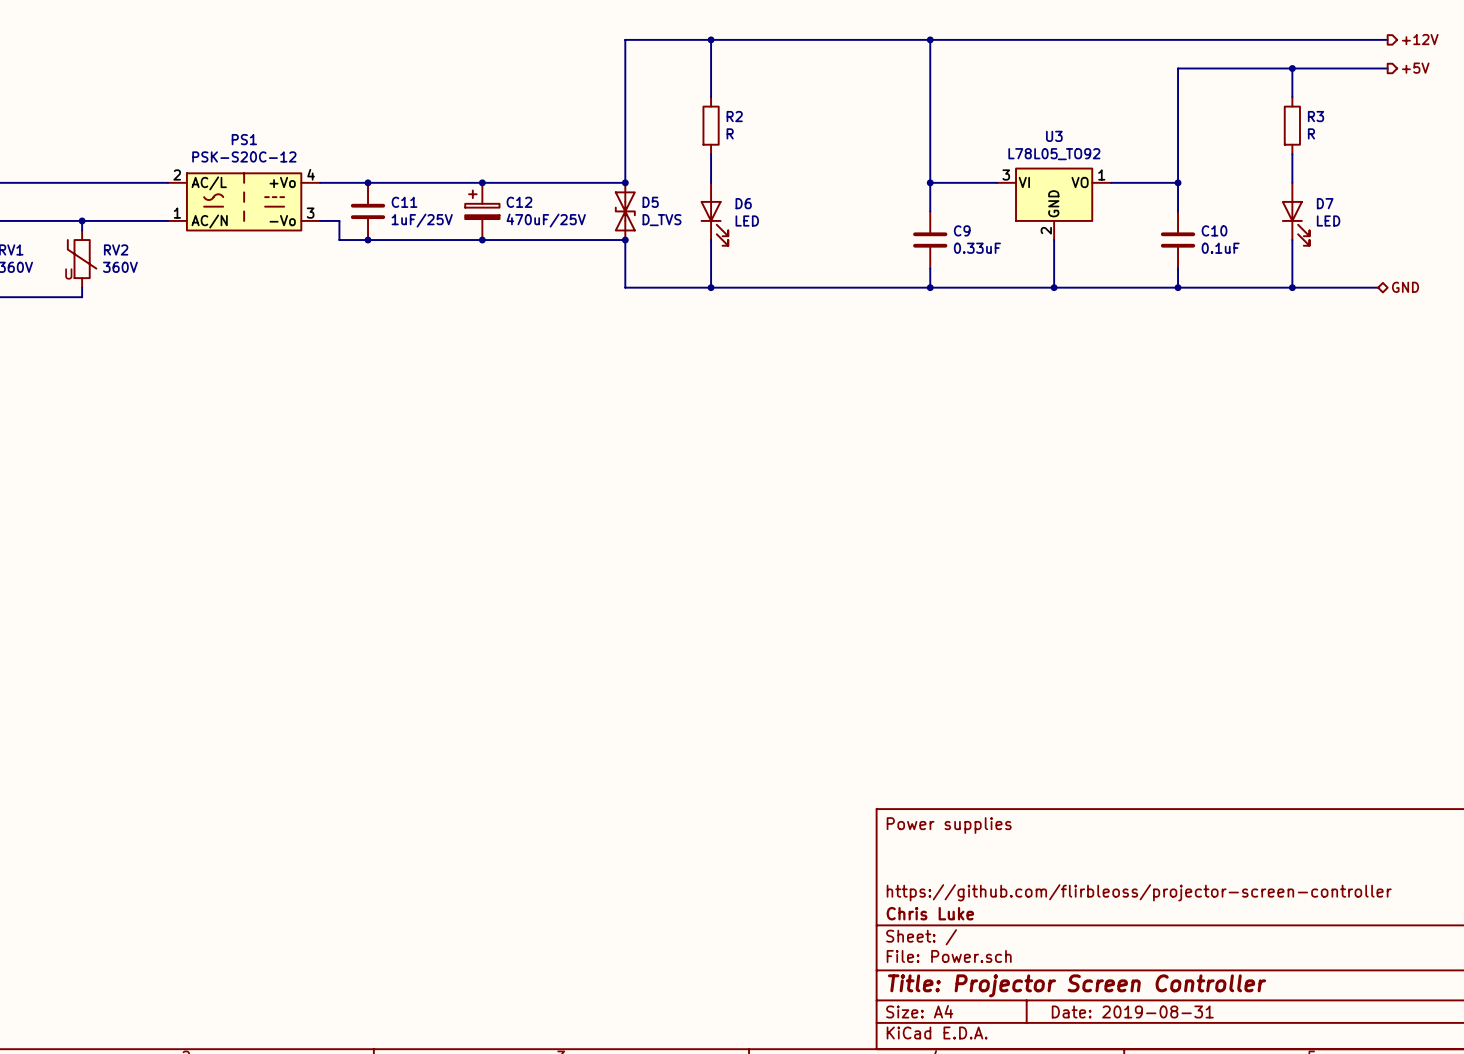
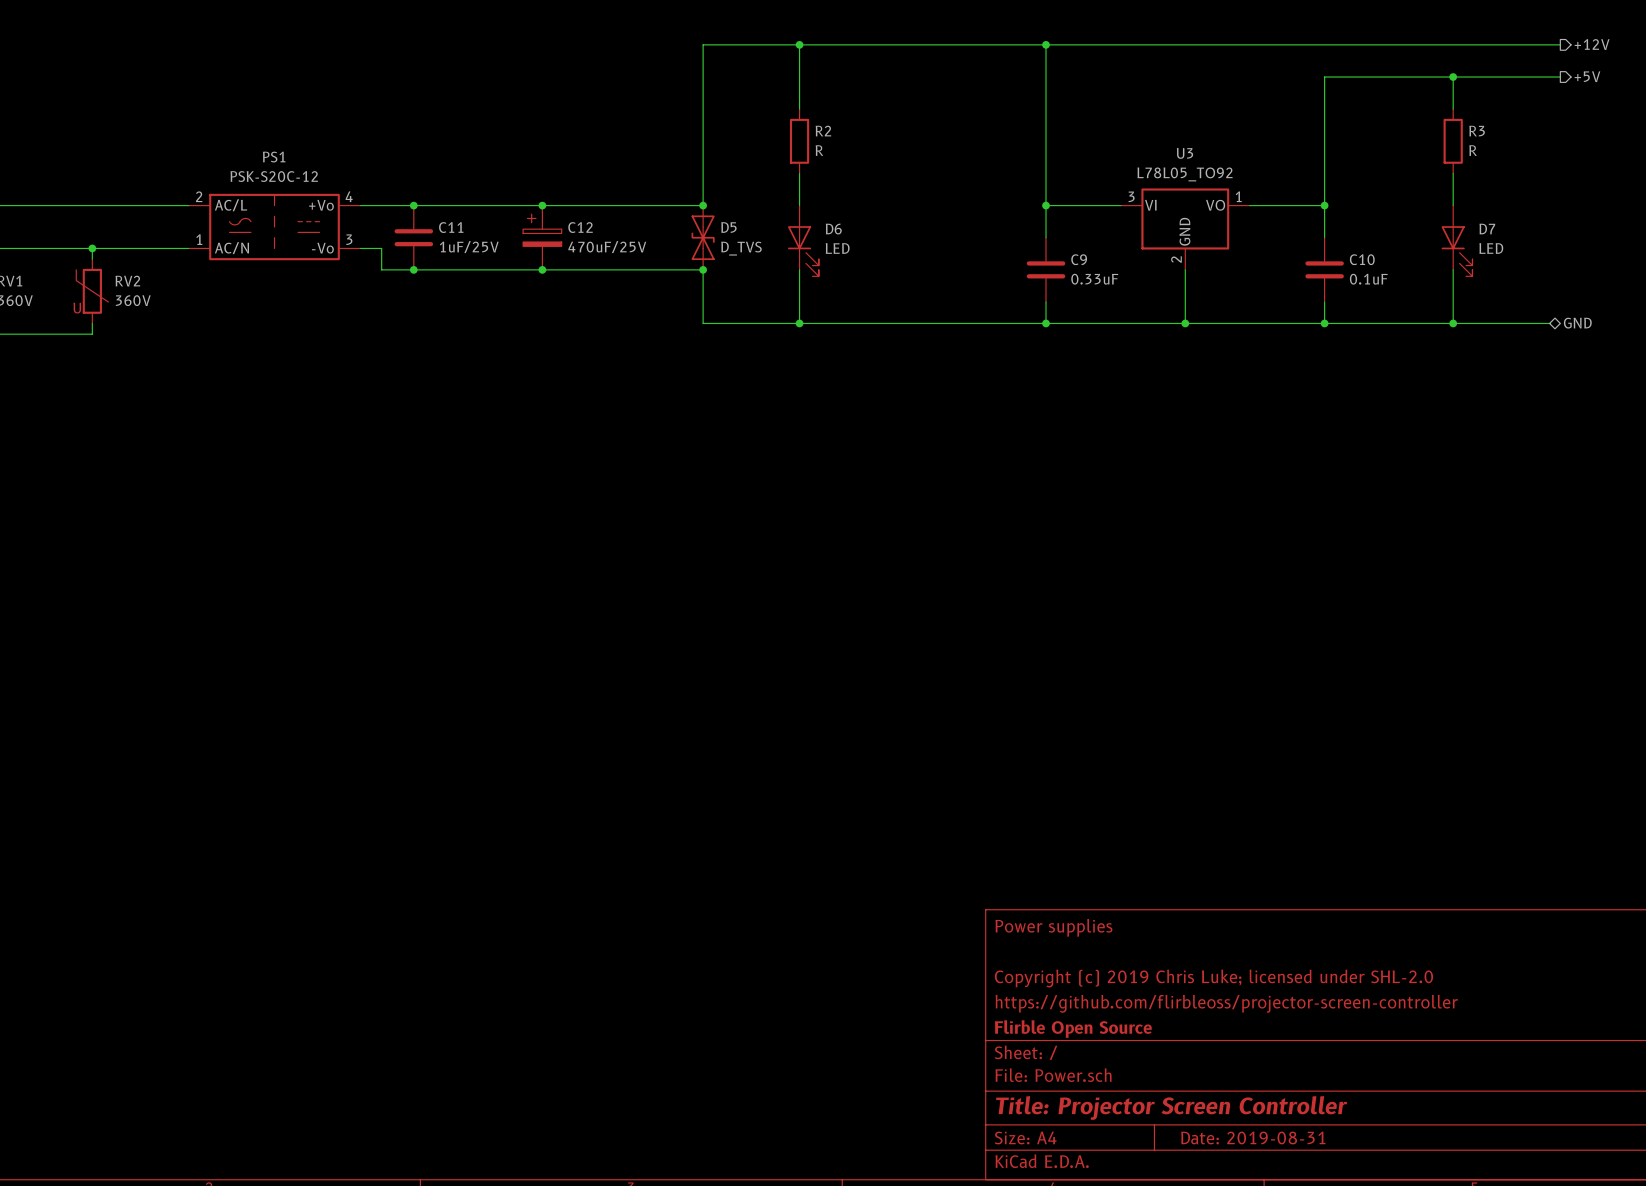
title block: none -> Copyright (c) 2019 Chris Luke; licensed under SHL-2.0 (1213, 978)
title block: Chris Luke (930, 913) -> Flirble Open Source (1073, 1029)

